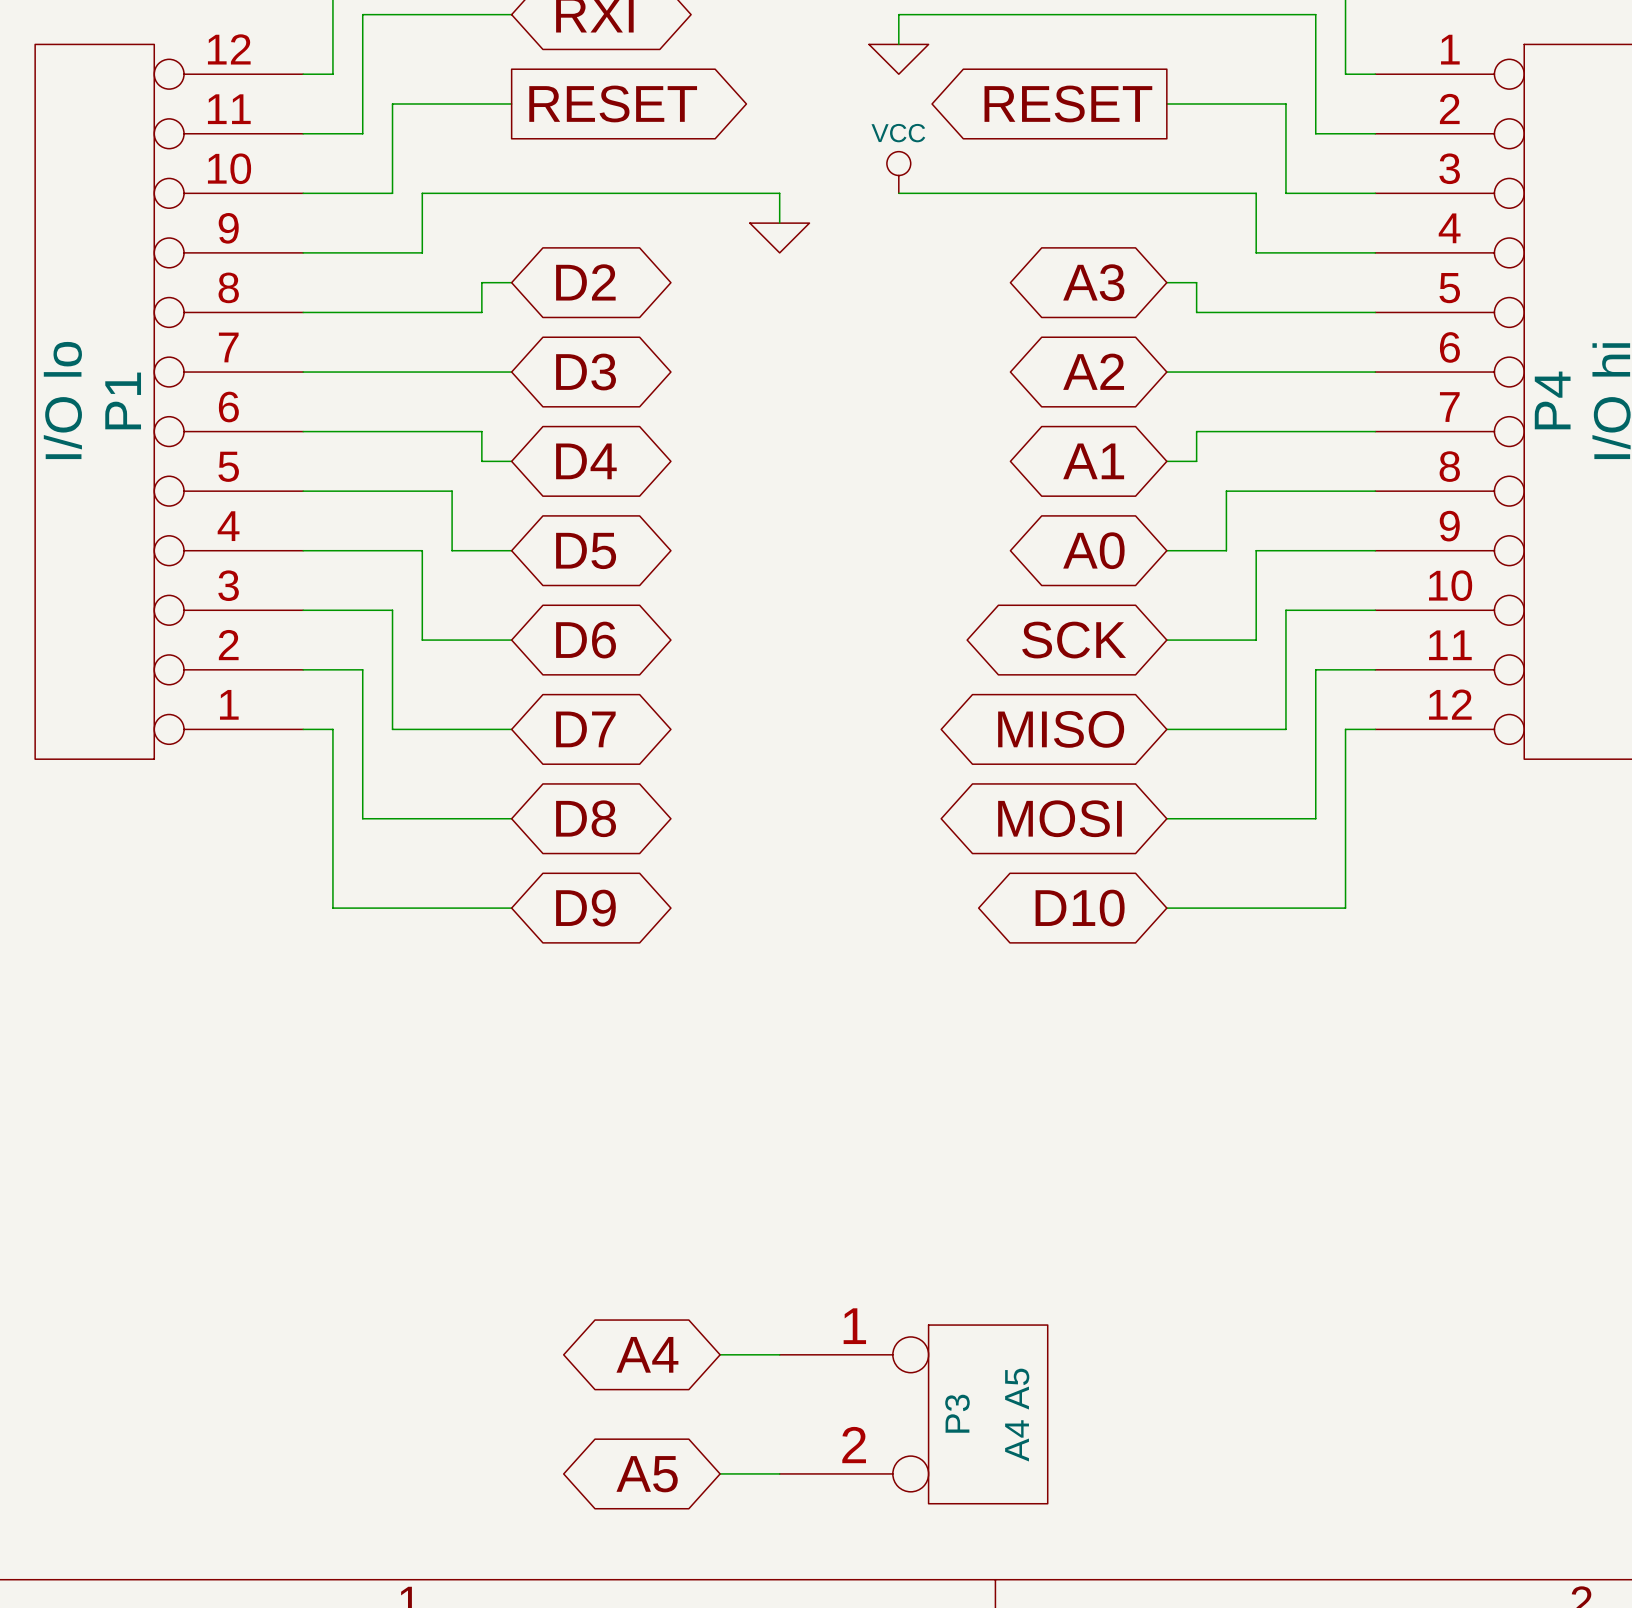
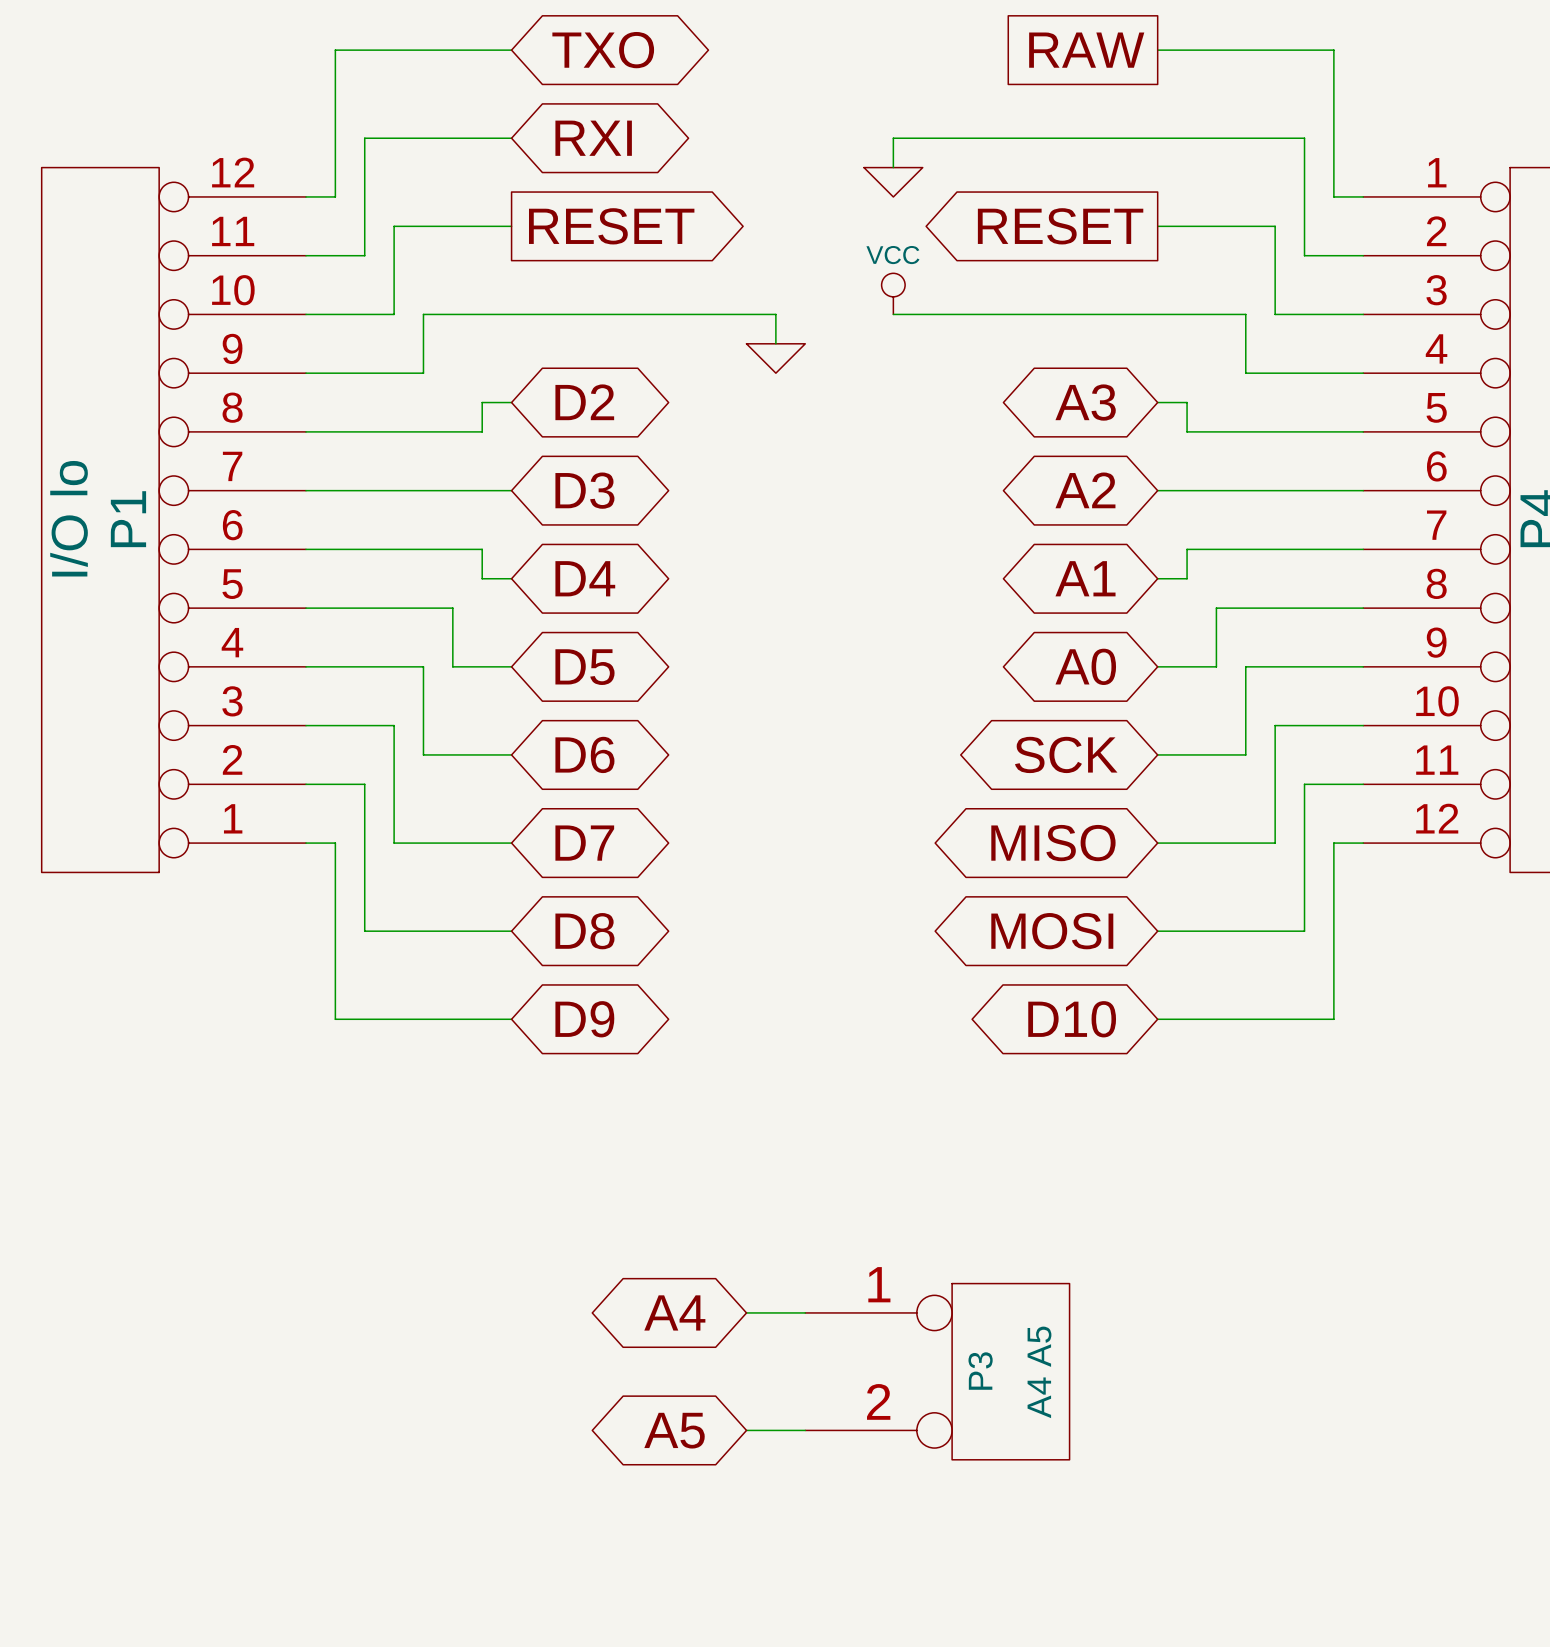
global label position: A4 (647, 1354) -> A4 (674, 1312)
wire: (720, 1354) (779, 1354) -> (746, 1312) (805, 1312)
P3 position: (913, 1414) -> (937, 1371)
wire: (720, 1473) (779, 1473) -> (746, 1430) (805, 1430)
global label position: A5 (647, 1474) -> A5 (674, 1430)

